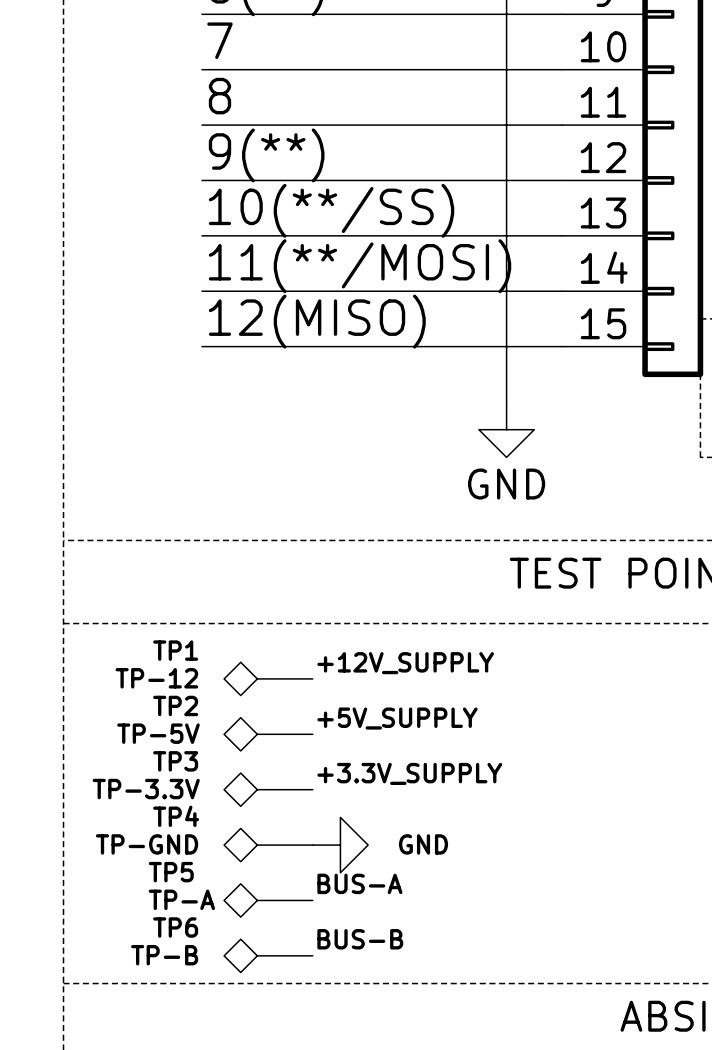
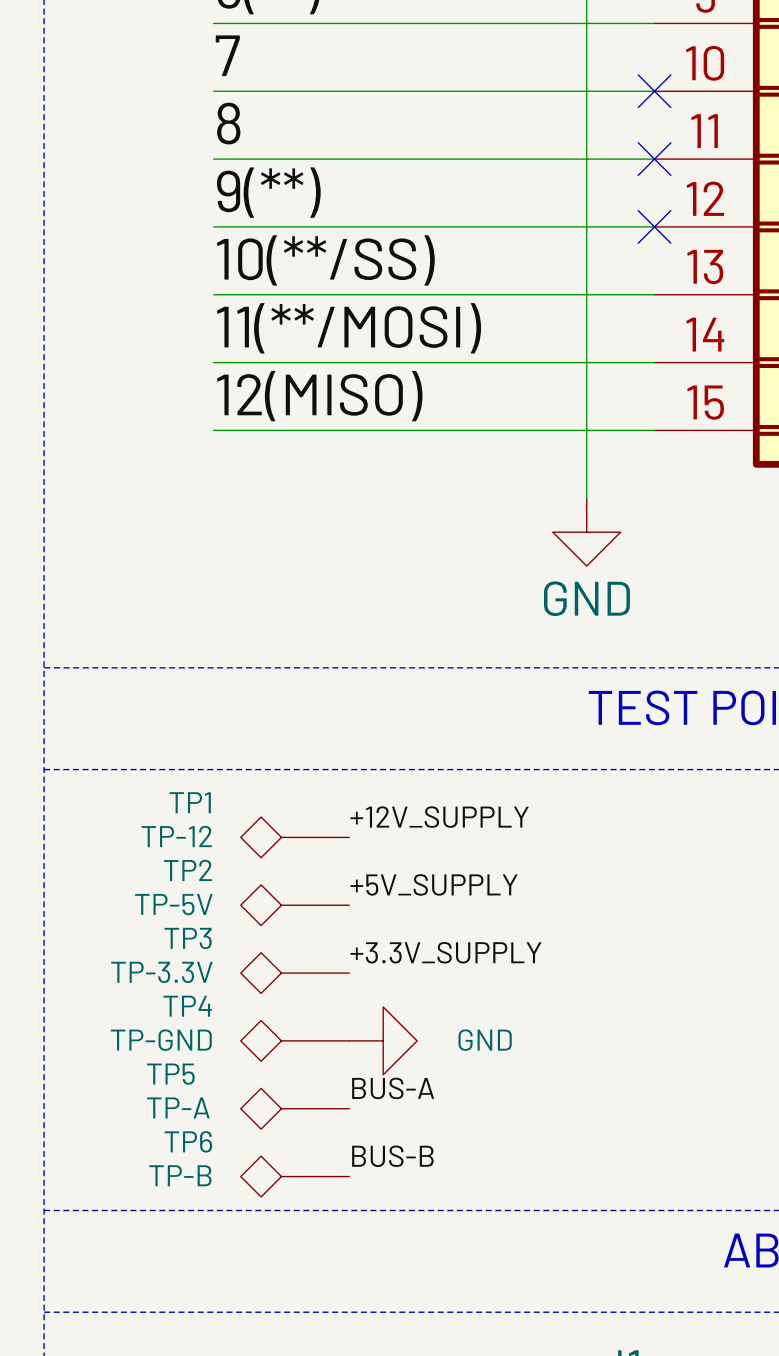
no-connect mark: none -> (654, 91)
no-connect mark: none -> (654, 159)
no-connect mark: none -> (654, 226)

